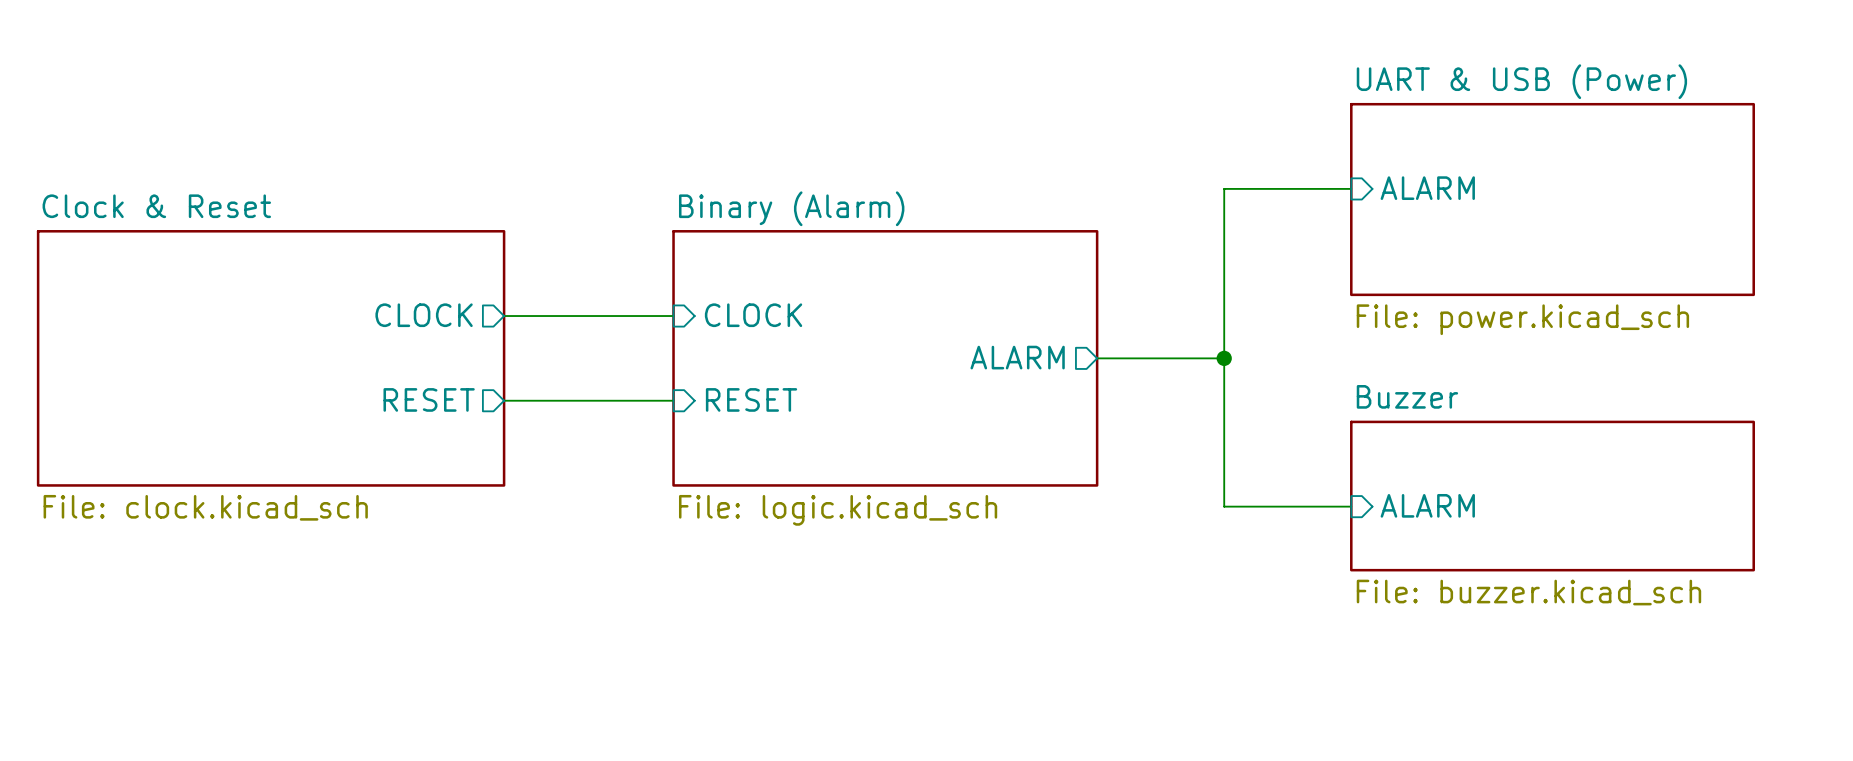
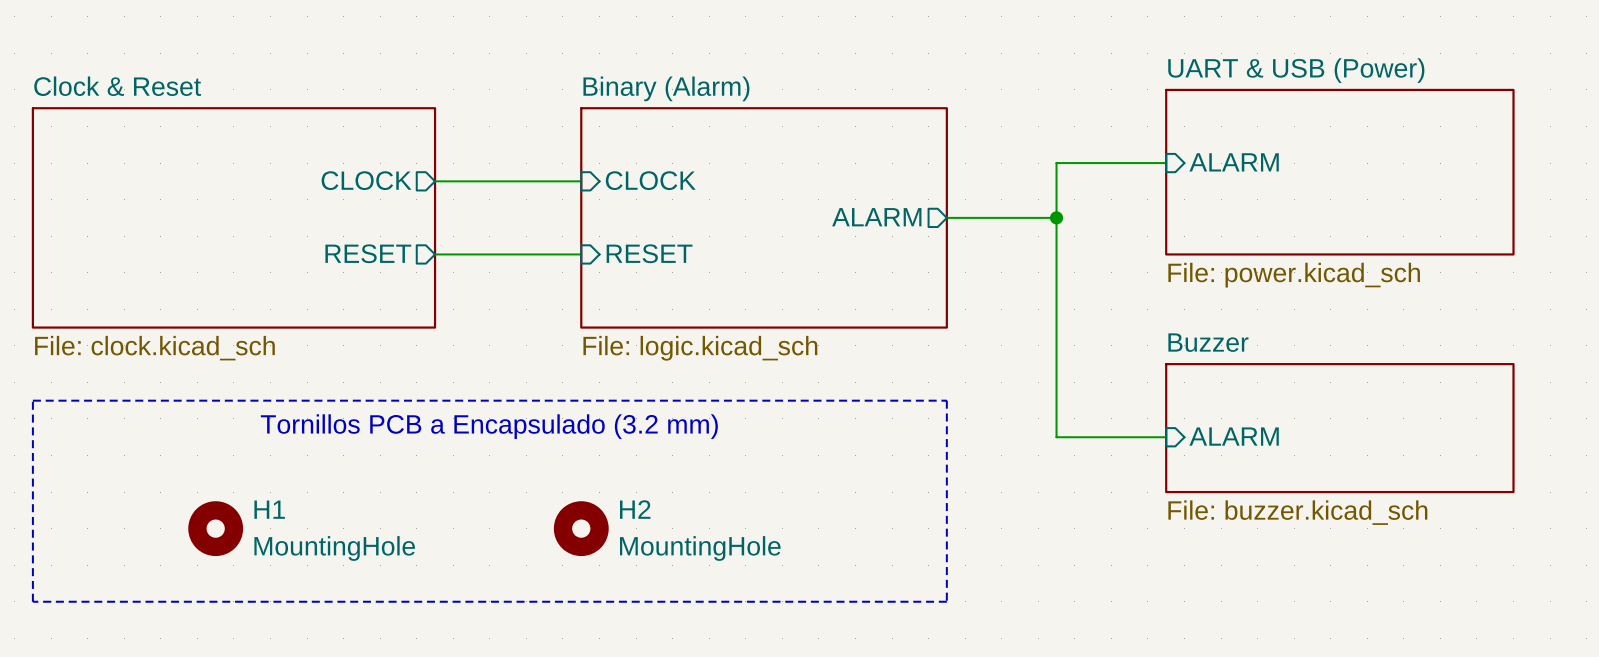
junction: none -> (1056, 217)
sheet pin position: CLOCK (424, 315) -> CLOCK (366, 180)
sheet pin position: CLOCK (753, 315) -> CLOCK (650, 180)
wire: (504, 316) (673, 316) -> (435, 181) (581, 181)
sheet pin position: ALARM (1017, 357) -> ALARM (876, 217)
sheet Clock & Reset position: (271, 358) -> (233, 217)
sheet Binary (Alarm) position: (885, 358) -> (764, 217)
wire: (1097, 358) (1224, 358) -> (946, 217) (1056, 217)
junction: (1224, 358) -> none
sheet pin position: RESET (429, 399) -> RESET (368, 253)
sheet pin position: RESET (751, 399) -> RESET (649, 253)
wire: (504, 400) (673, 400) -> (435, 254) (581, 254)
line: none -> (32, 400) (946, 400) (946, 601) (32, 601) (32, 400)
text: none -> Tornillos PCB a Encapsulado (3.2 mm) (489, 426)
H1: none -> MountingHole (215, 528)
H2: none -> MountingHole (581, 528)

